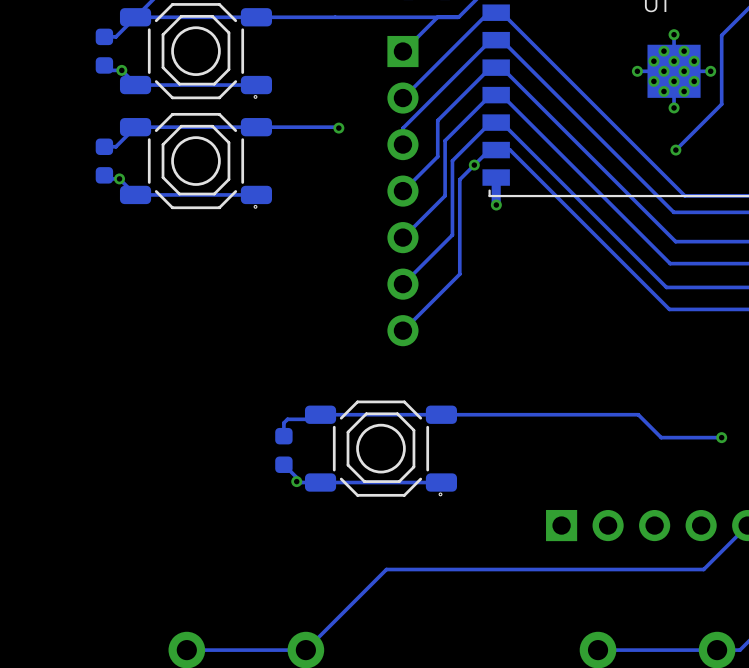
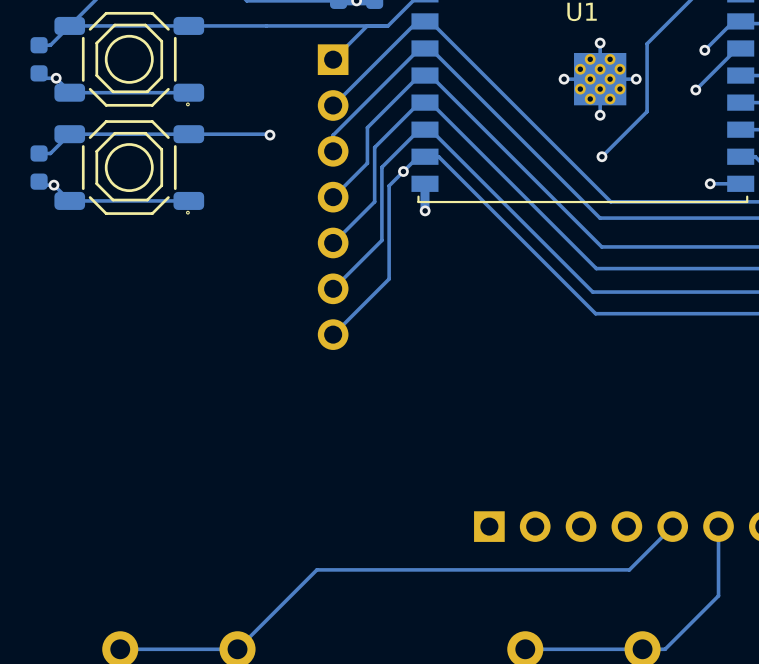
track: (283, 436) (283, 422) (287, 419) (315, 419) (320, 414) (638, 414) (661, 437) (721, 437) -> none
via: (721, 437) -> none
part: (380, 448) -> none
part: (283, 450) -> none
track: (283, 464) (296, 477) (296, 481) (301, 482) (441, 482) -> none
via: (296, 481) -> none

